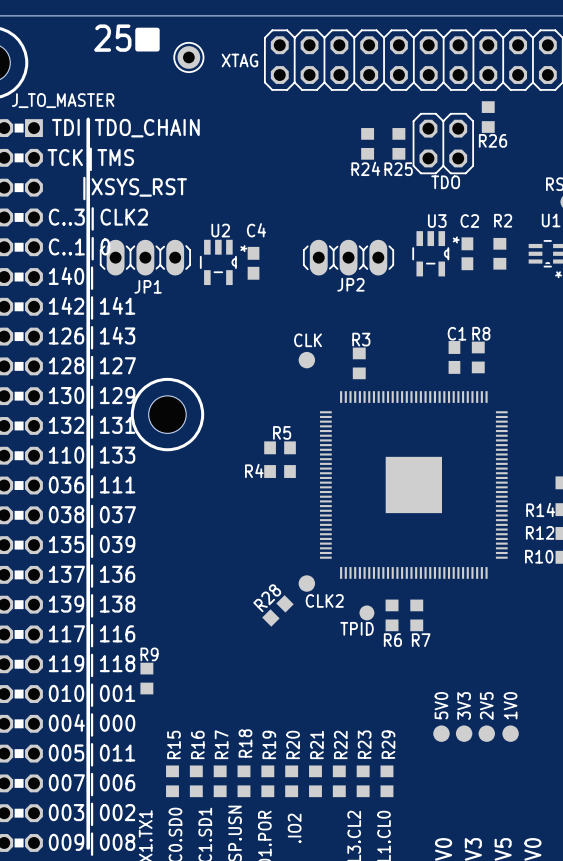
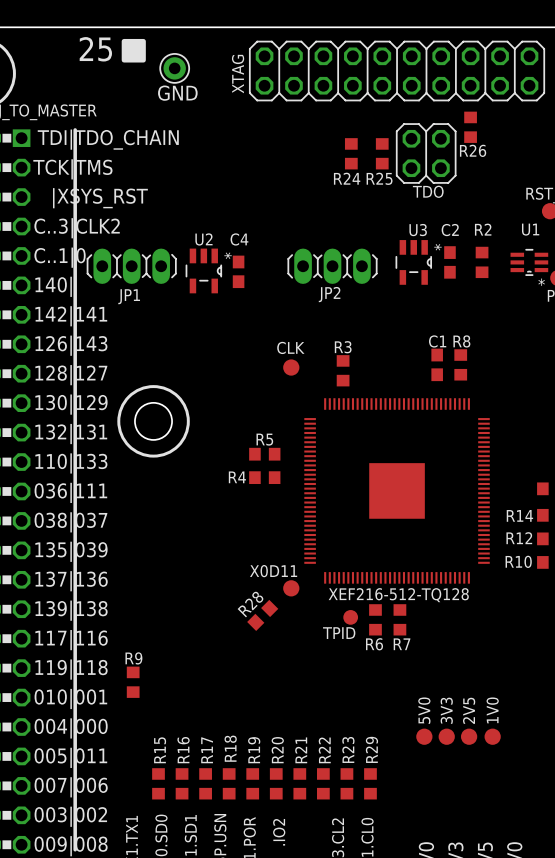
XTAG name rotation: 0° (239, 60) -> 90° counterclockwise (238, 74)
text: none -> GND (177, 93)
text: none -> XEF216-512-TQ128 (398, 595)
CLK2 name: CLK2 (324, 600) -> X0D11 (273, 571)

